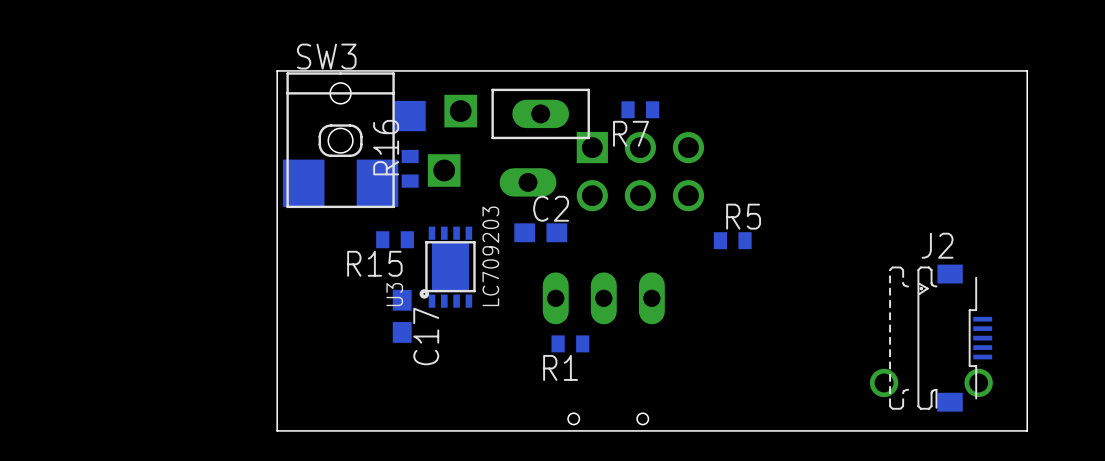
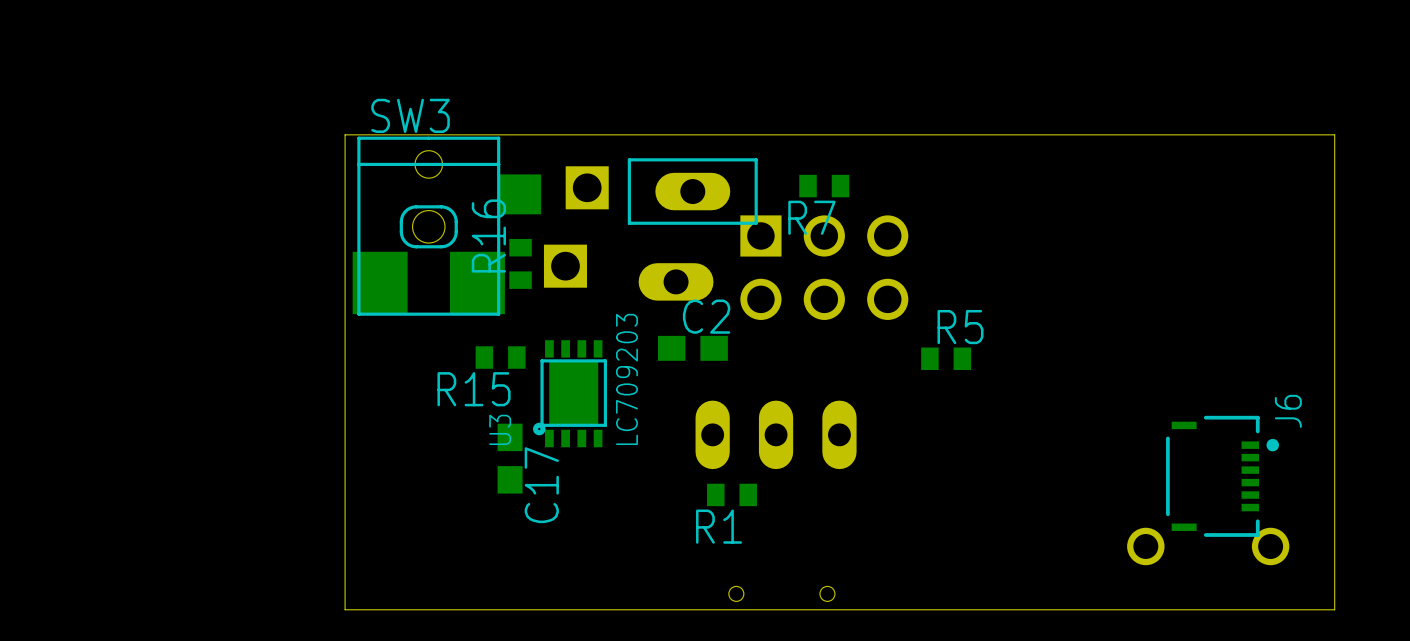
J6: none -> (1222, 476)
J2: (940, 338) -> none

